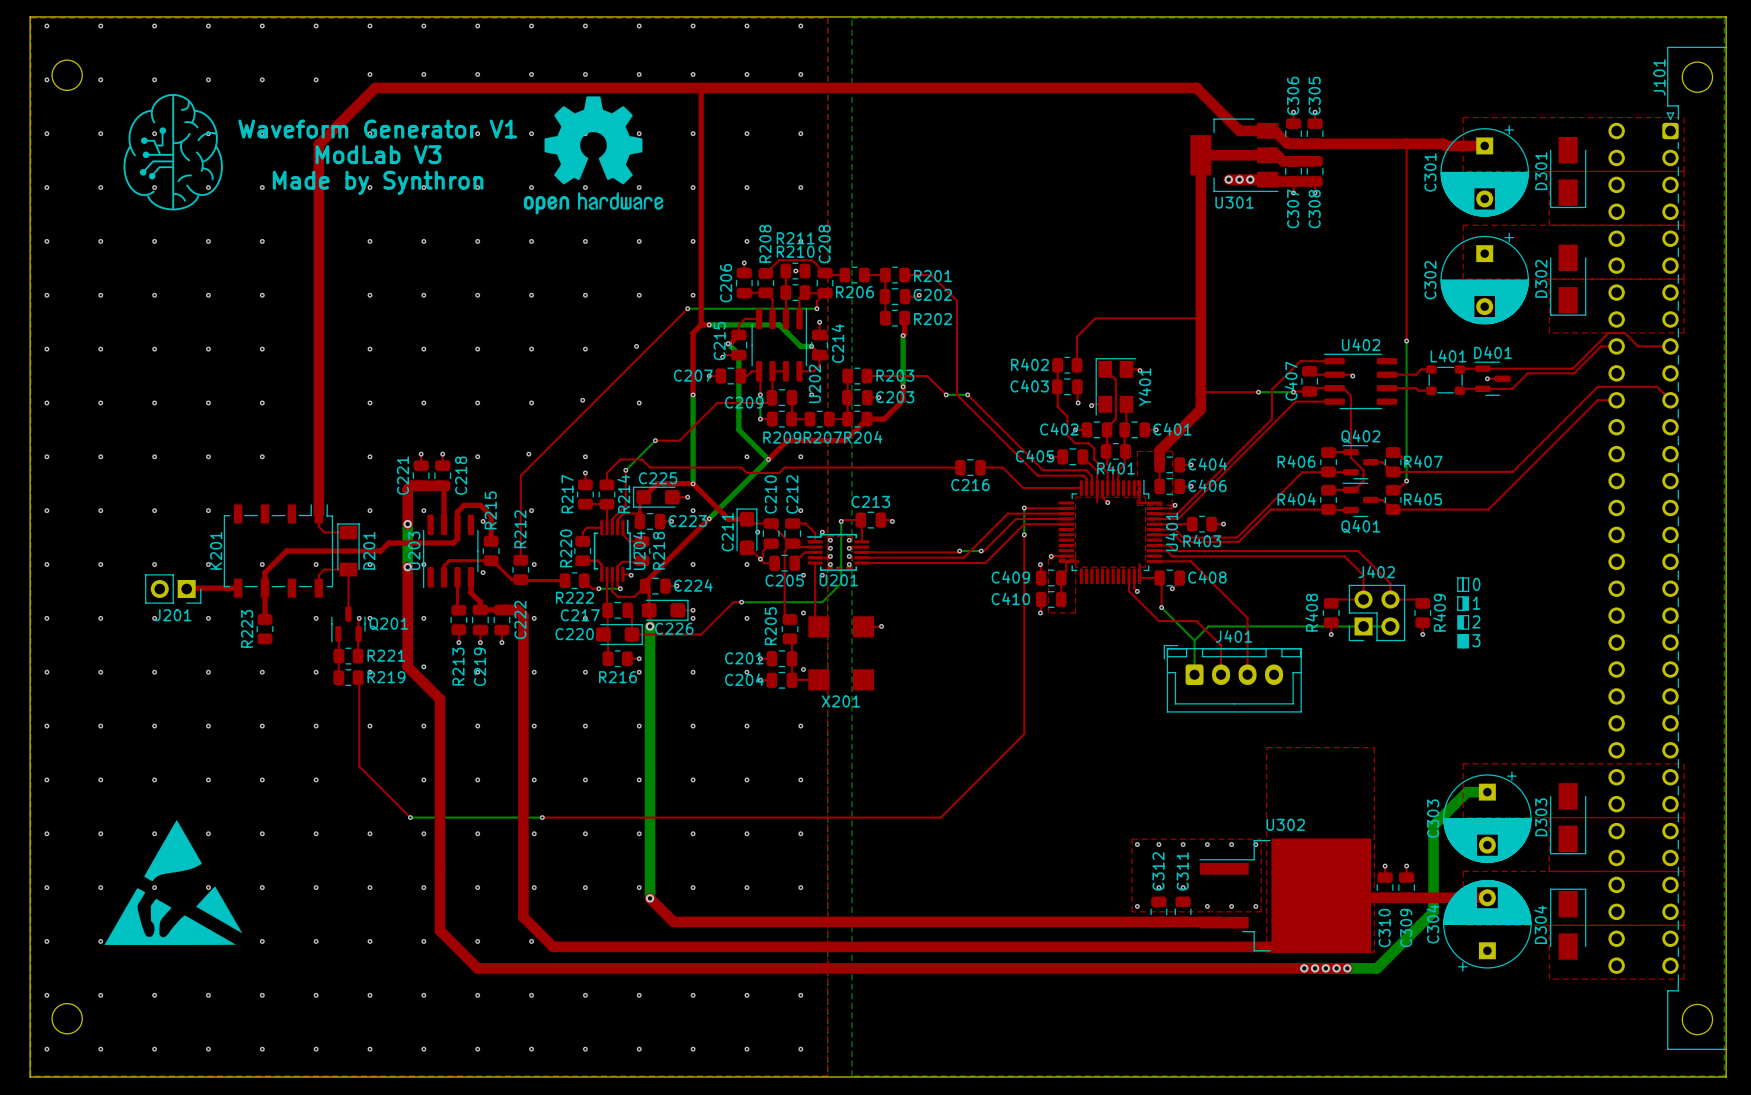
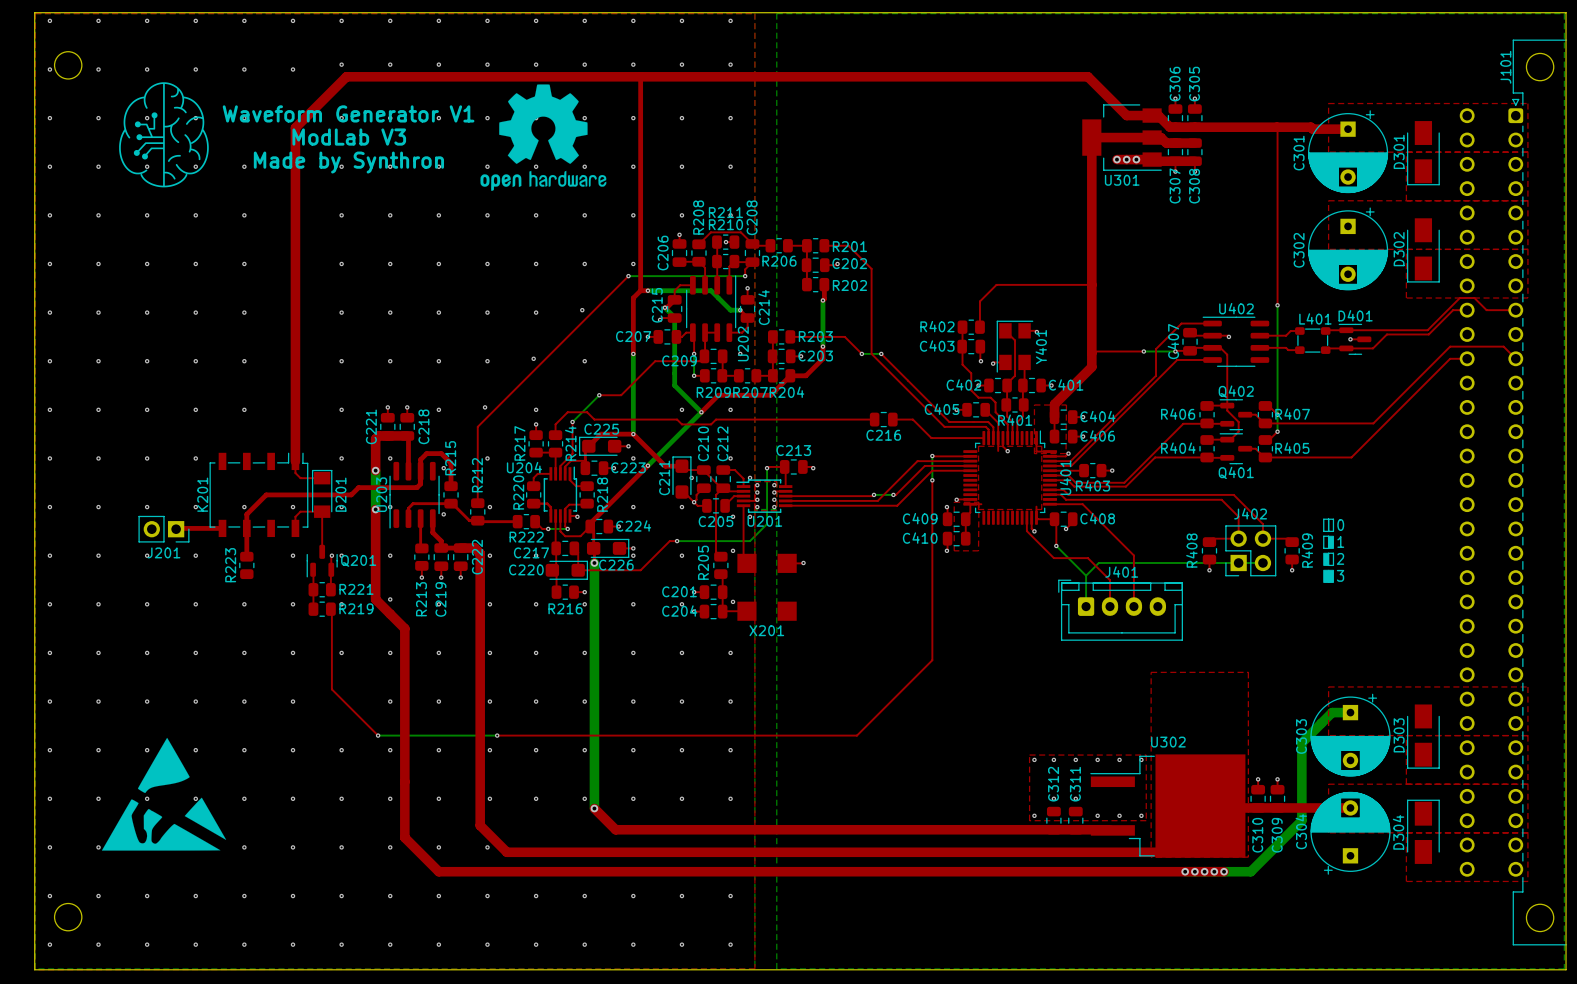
U204 name rotation: 0° (639, 550) -> 90° clockwise (524, 467)
U204 name position: U204 (639, 550) -> U204 (524, 467)

